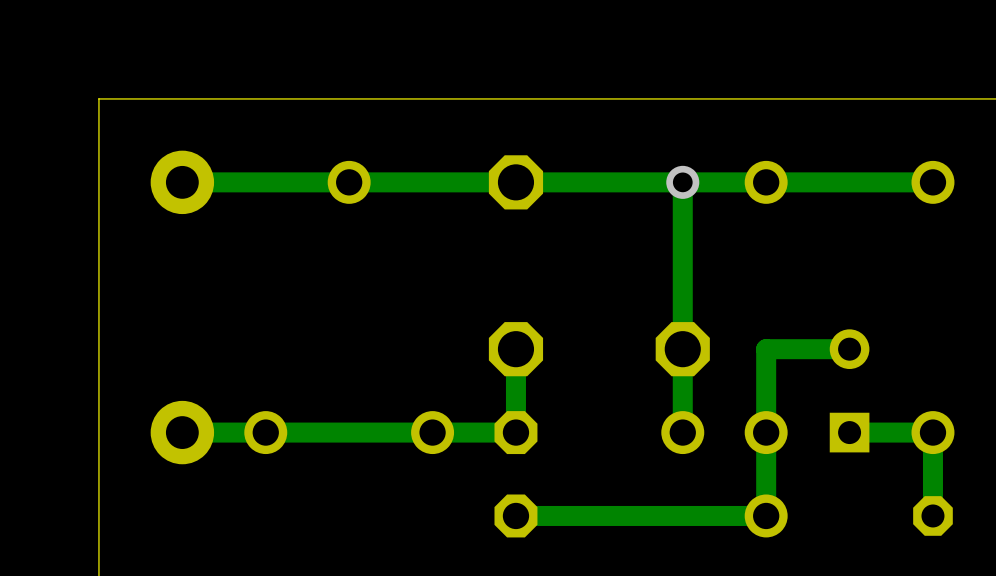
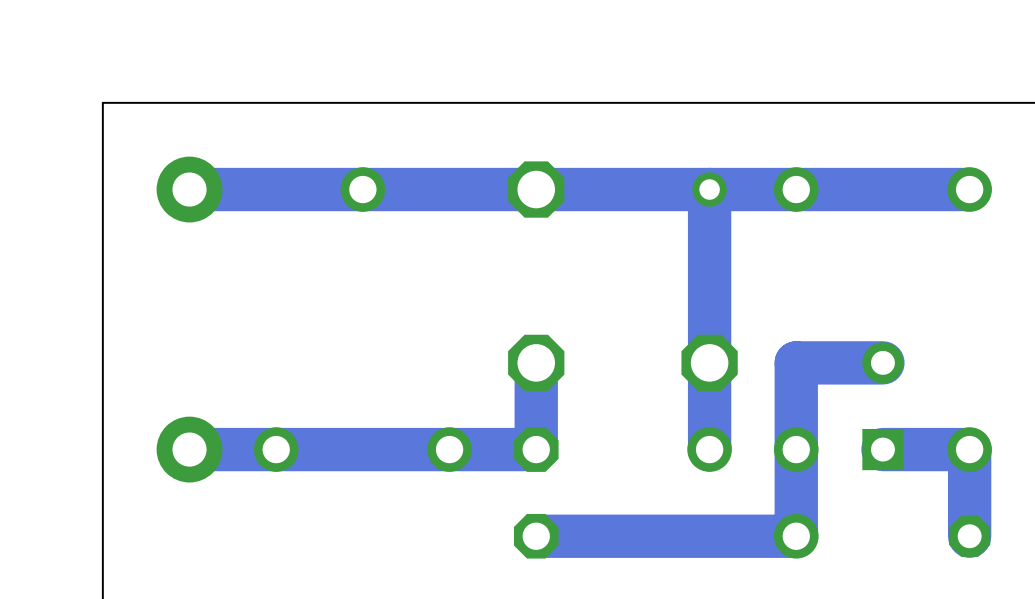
track width: thin (682, 182) (682, 432) -> thick (709, 189) (709, 449)
track width: thin (932, 182) (182, 182) -> thick (969, 189) (189, 189)
track width: thin (515, 349) (515, 432) (182, 432) -> thick (536, 362) (536, 449) (189, 449)
track width: thin (849, 349) (766, 349) (766, 515) (515, 515) -> thick (882, 362) (796, 362) (796, 536) (536, 536)
track width: thin (849, 432) (932, 432) (932, 515) -> thick (882, 449) (969, 449) (969, 536)

